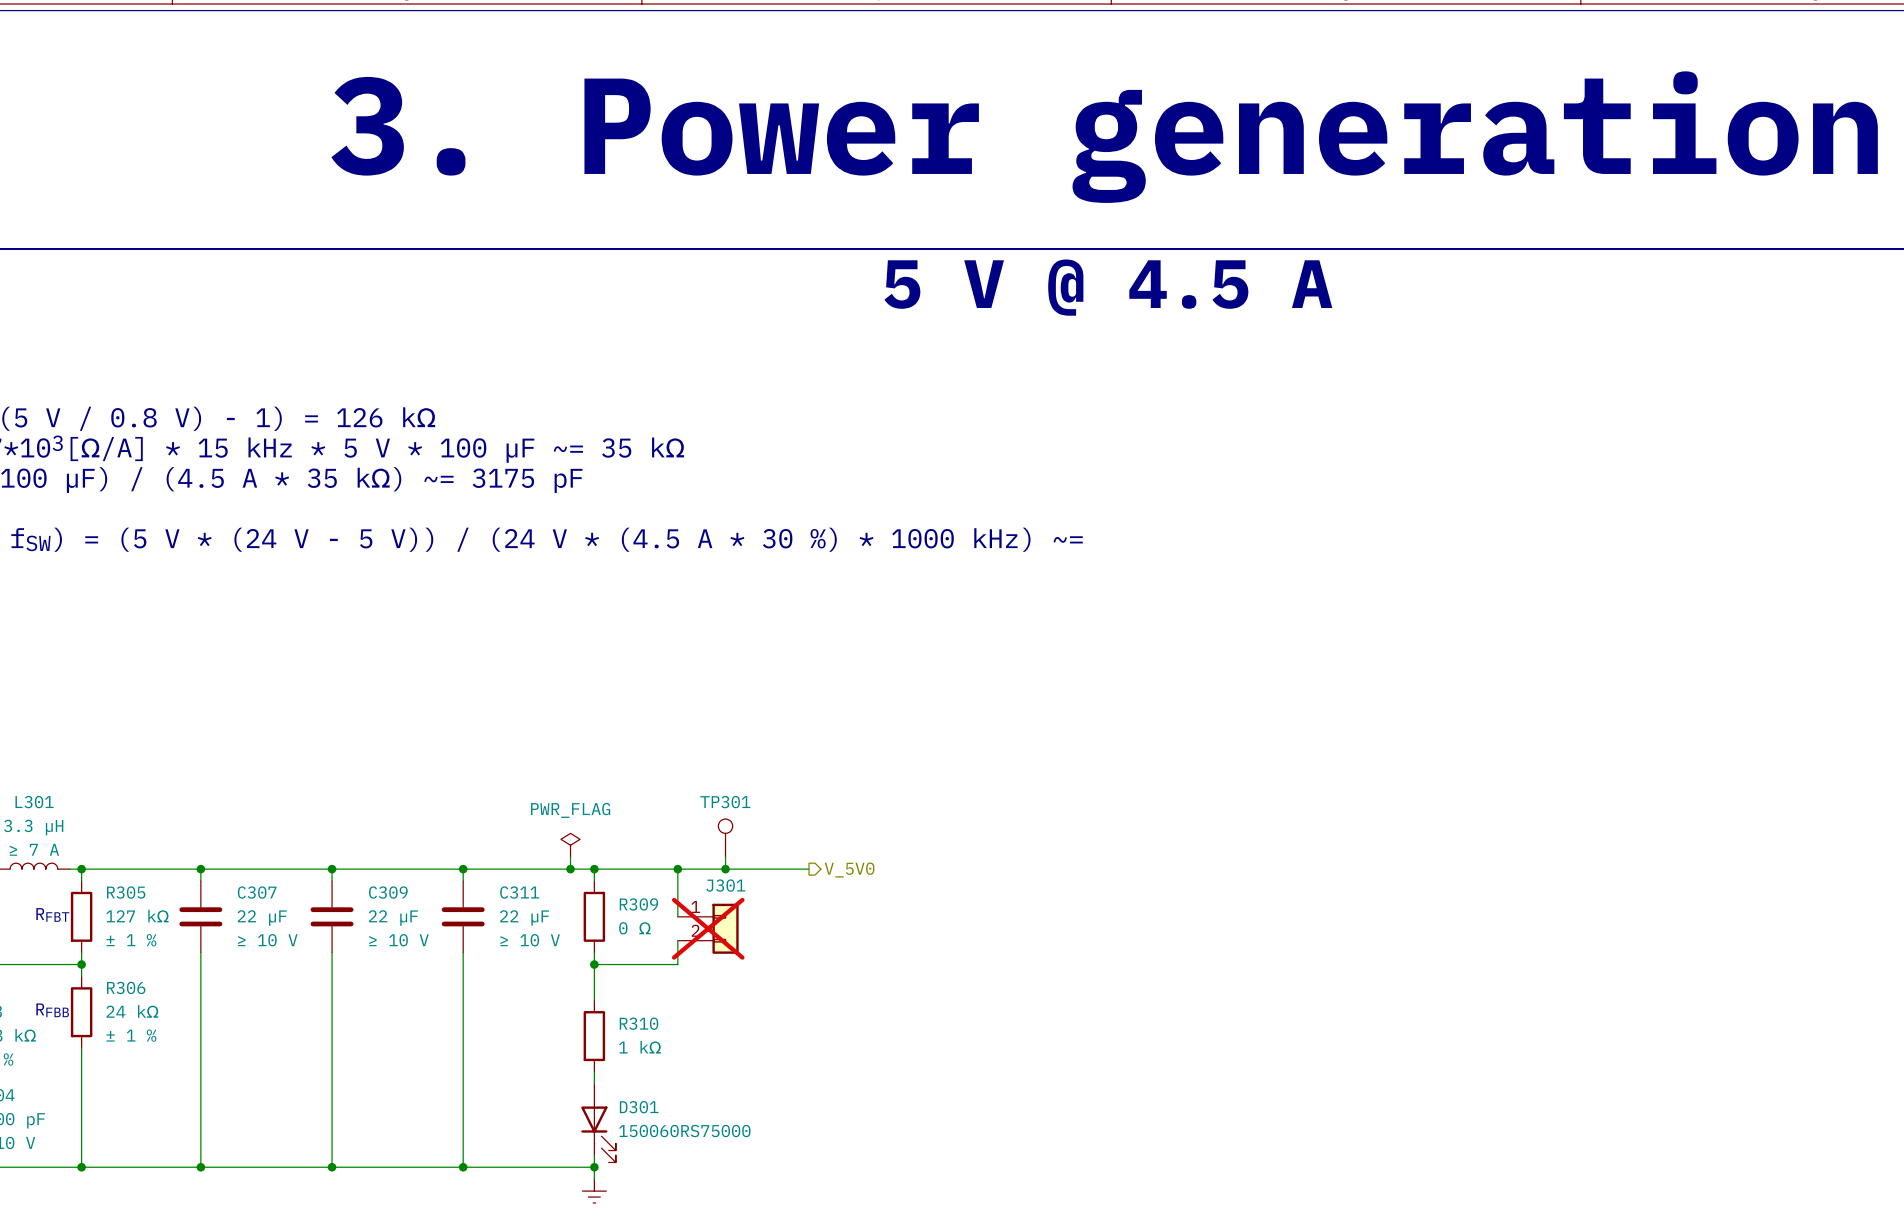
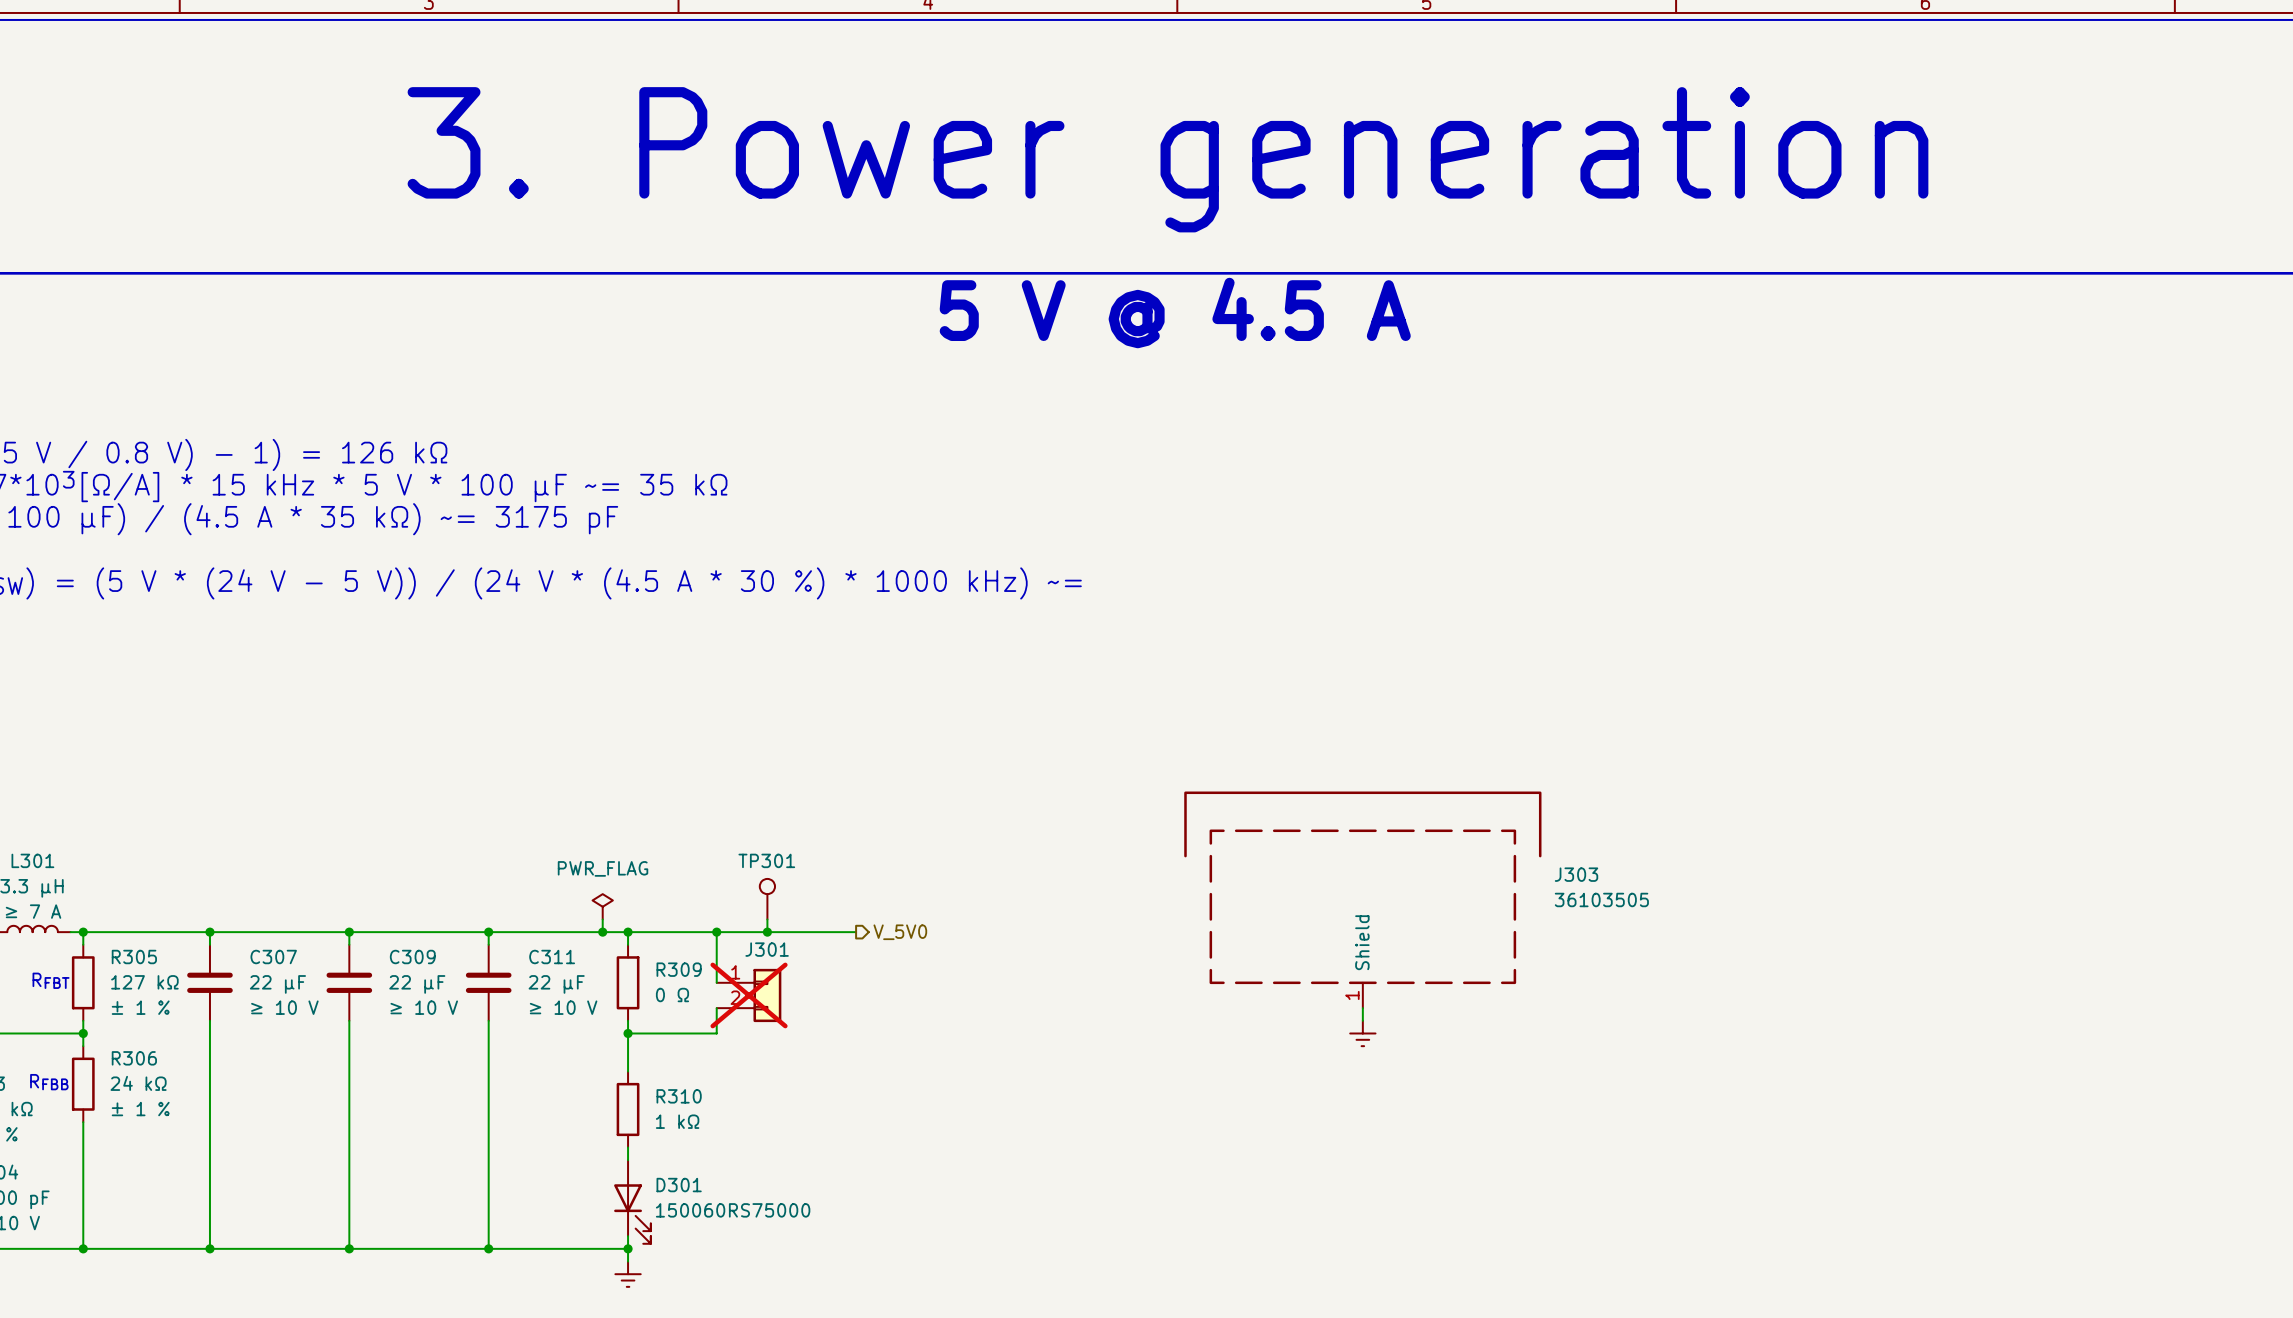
J303: none -> 36103505 (1362, 899)
wire: none -> (1362, 1008) (1362, 1020)
power symbol: none -> (1362, 1033)

